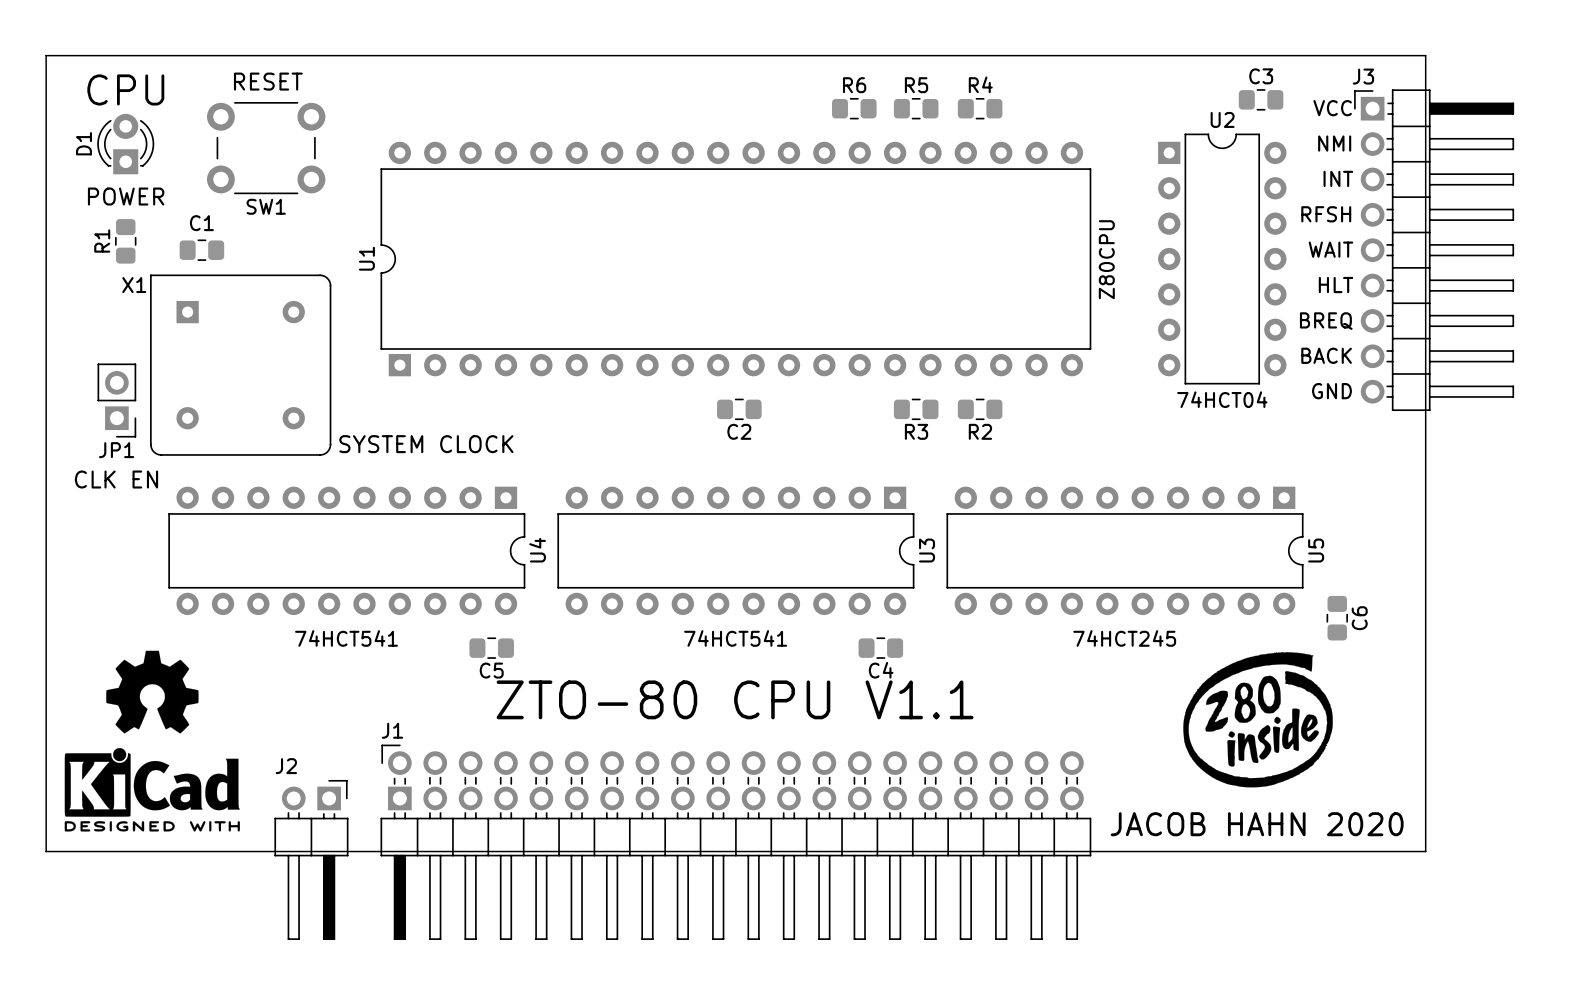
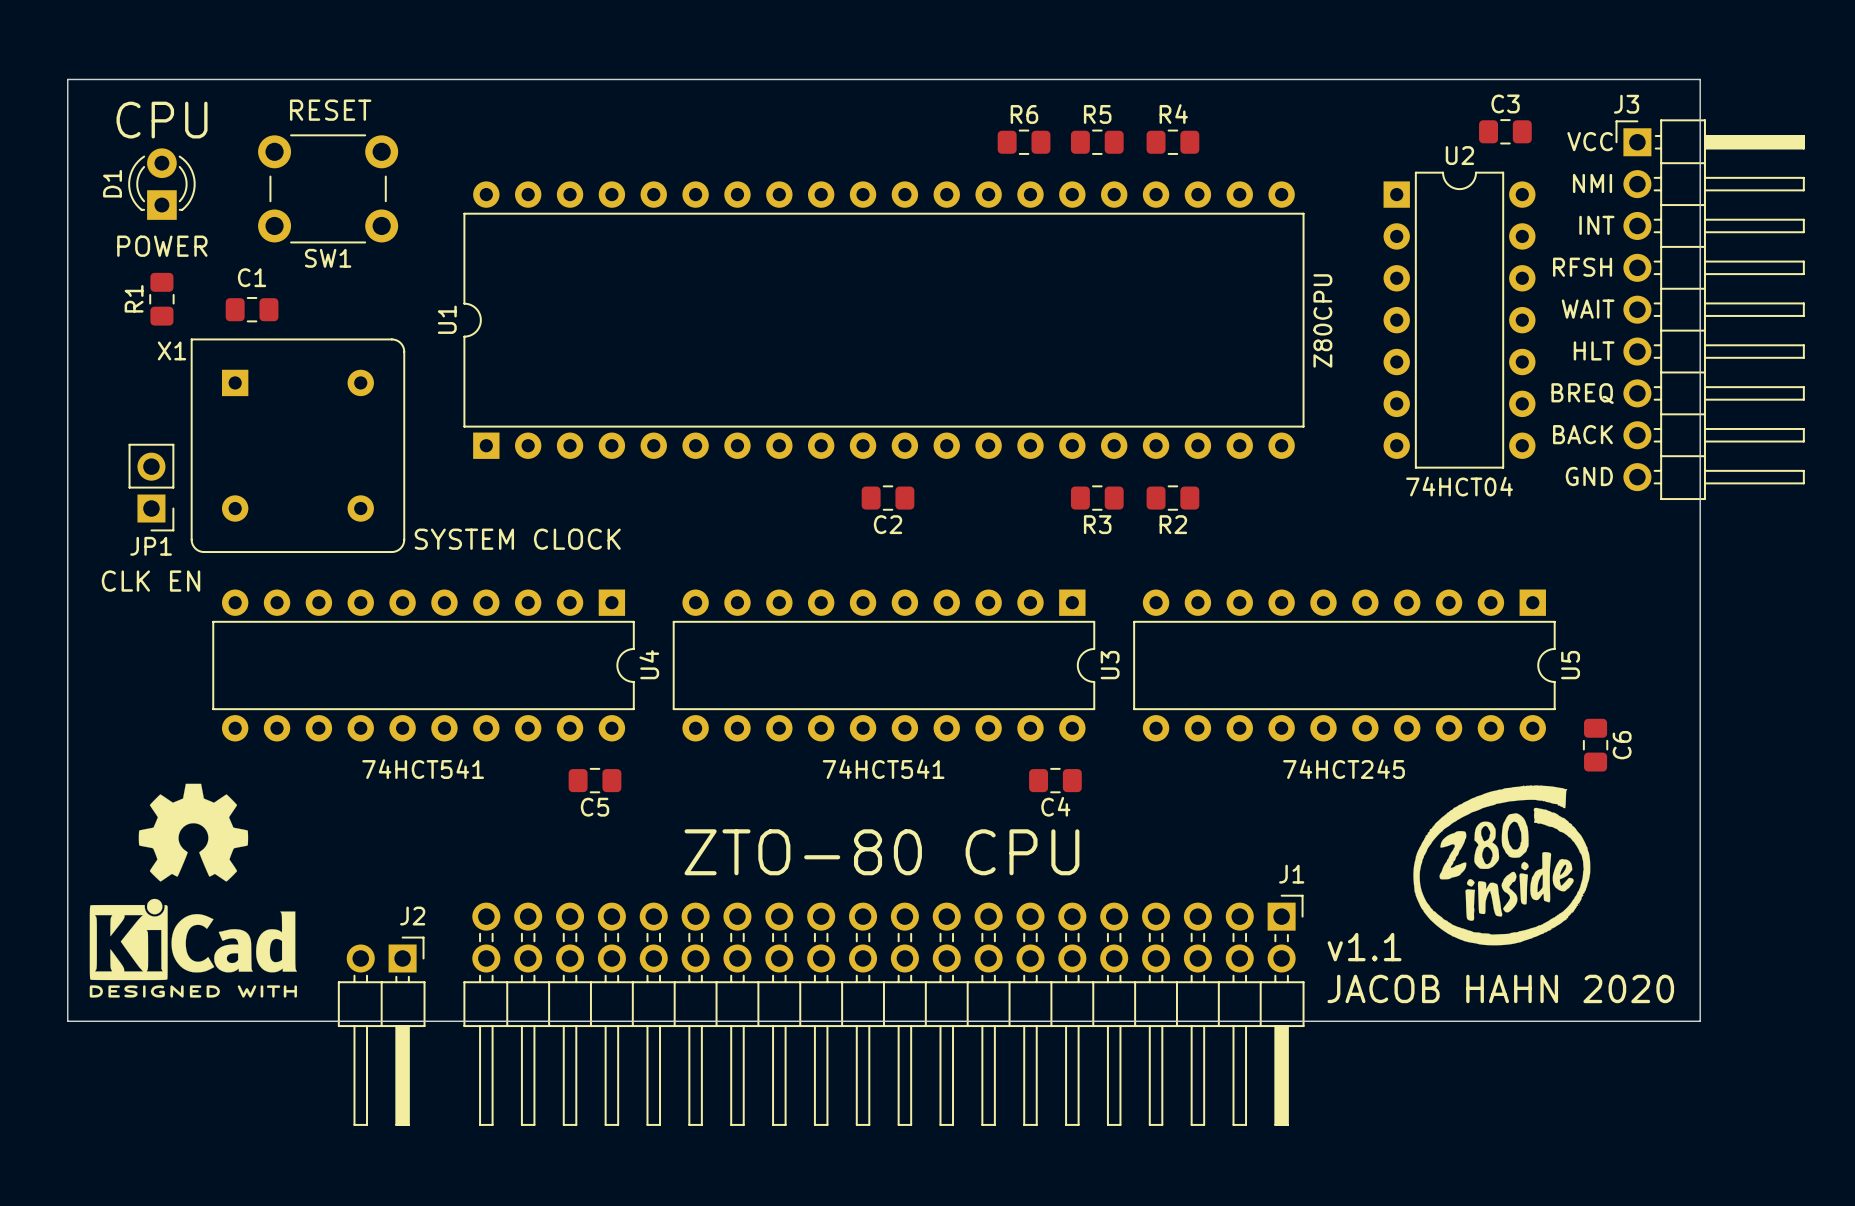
text: ZTO-80 CPU V1.1 (735, 699) -> ZTO-80 CPU (881, 852)
J1 name position: J1 (392, 730) -> J1 (1291, 874)
J1 footprint: [380, 744, 1092, 940] -> [463, 894, 1305, 1126]
J2 name position: J2 (286, 766) -> J2 (412, 916)
text: none -> v1.1 (1364, 947)

